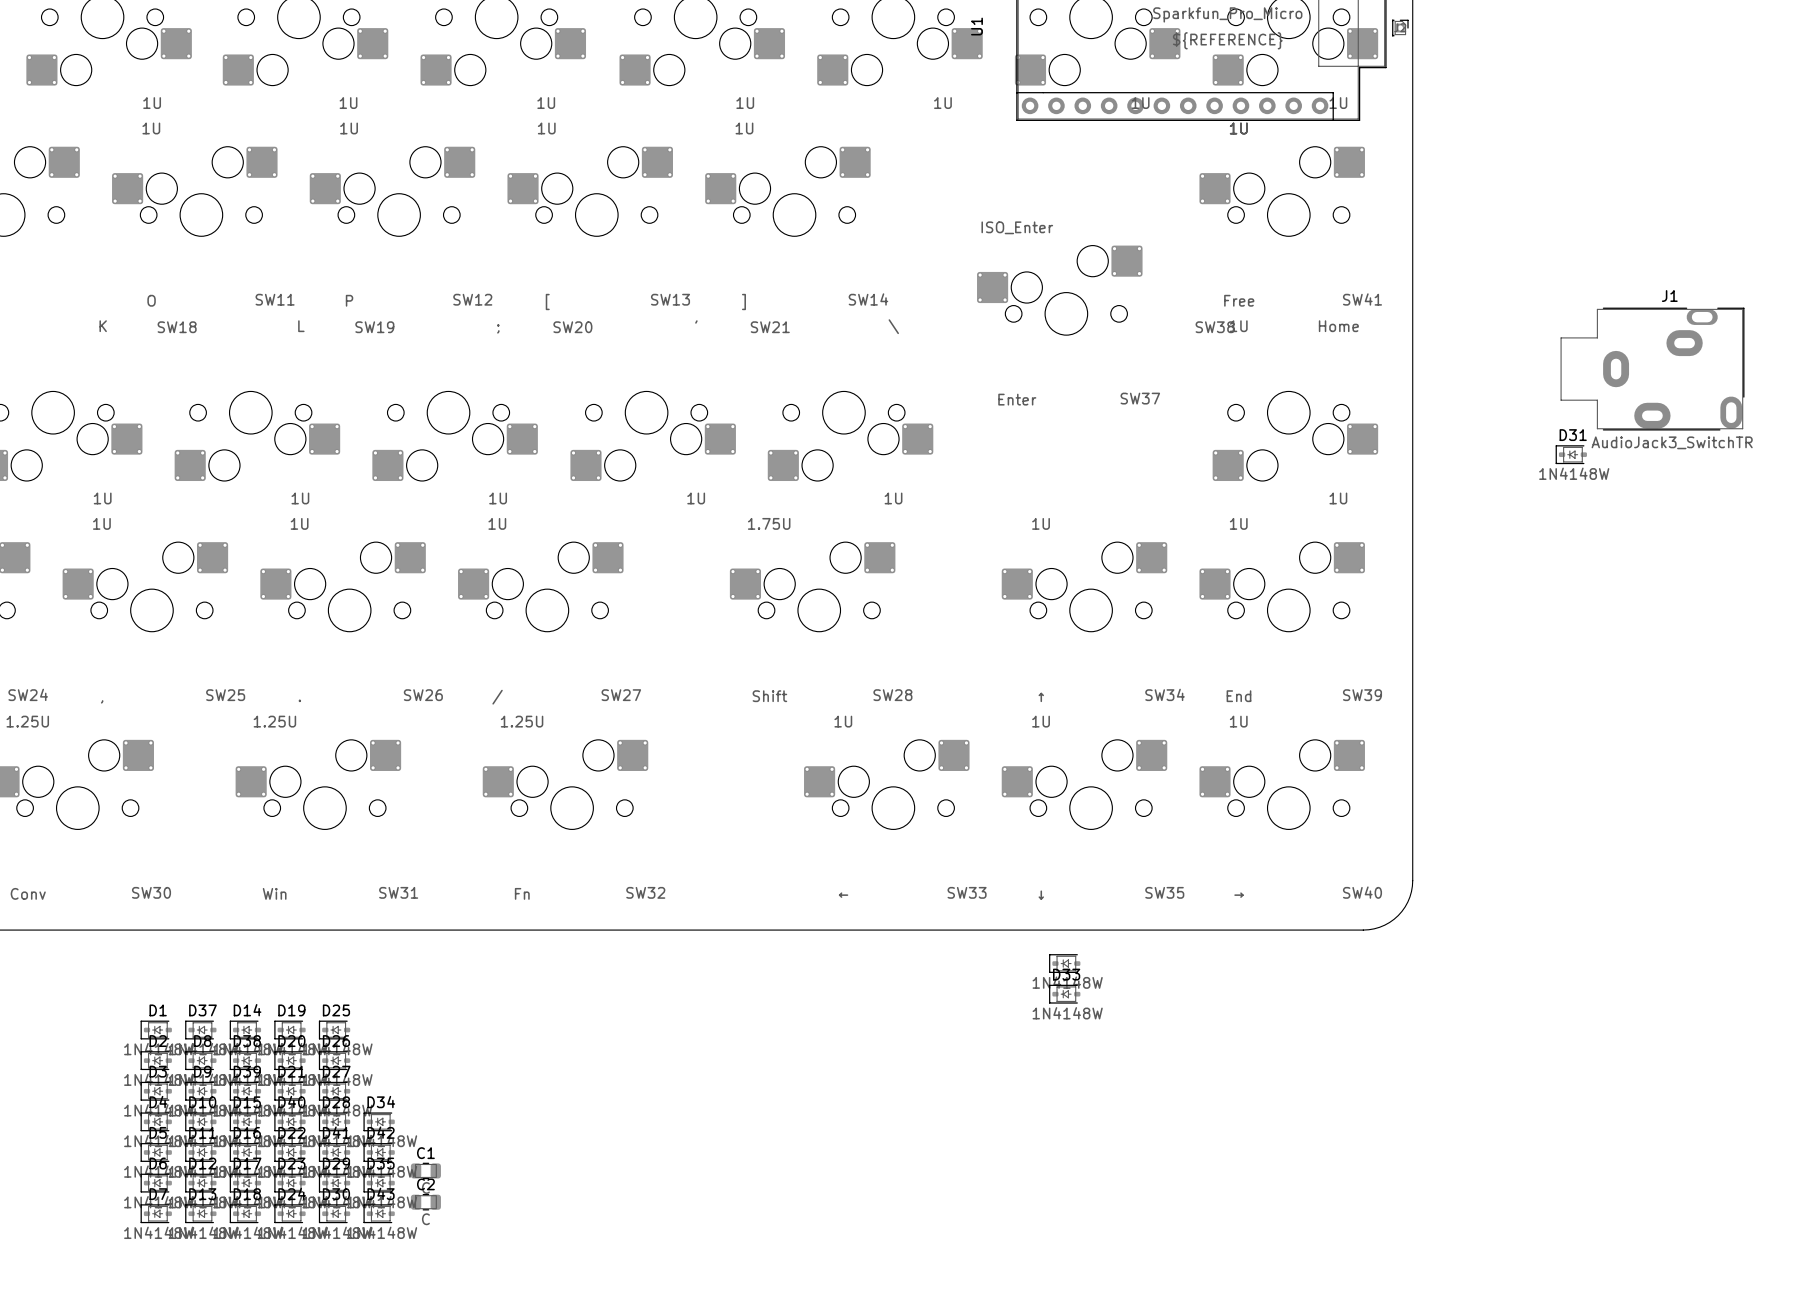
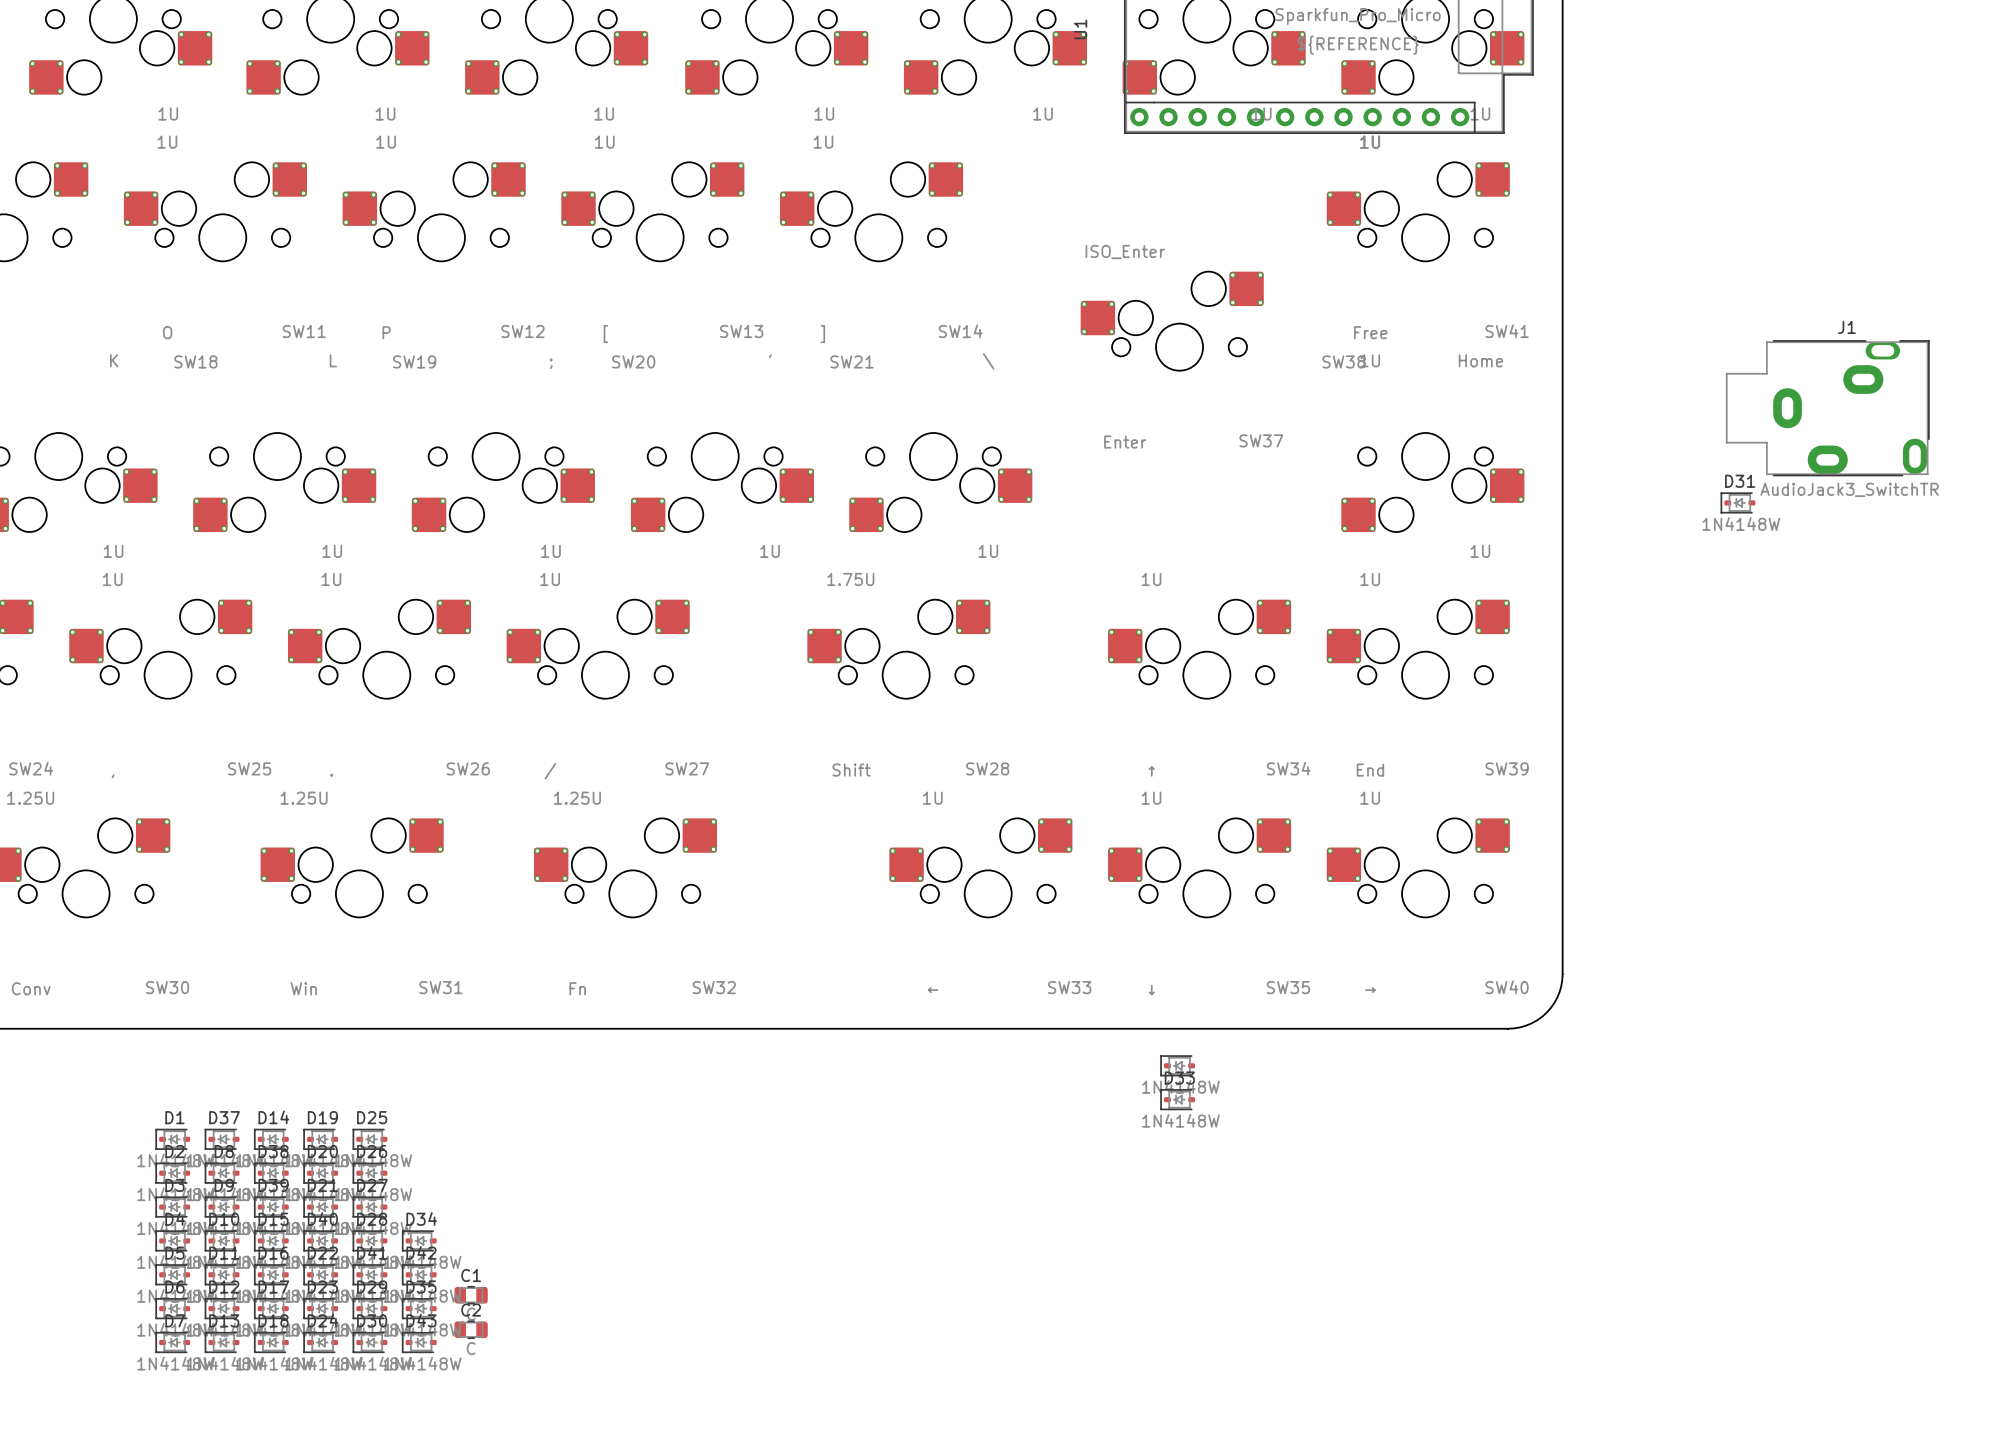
part: (1400, 28) -> none

